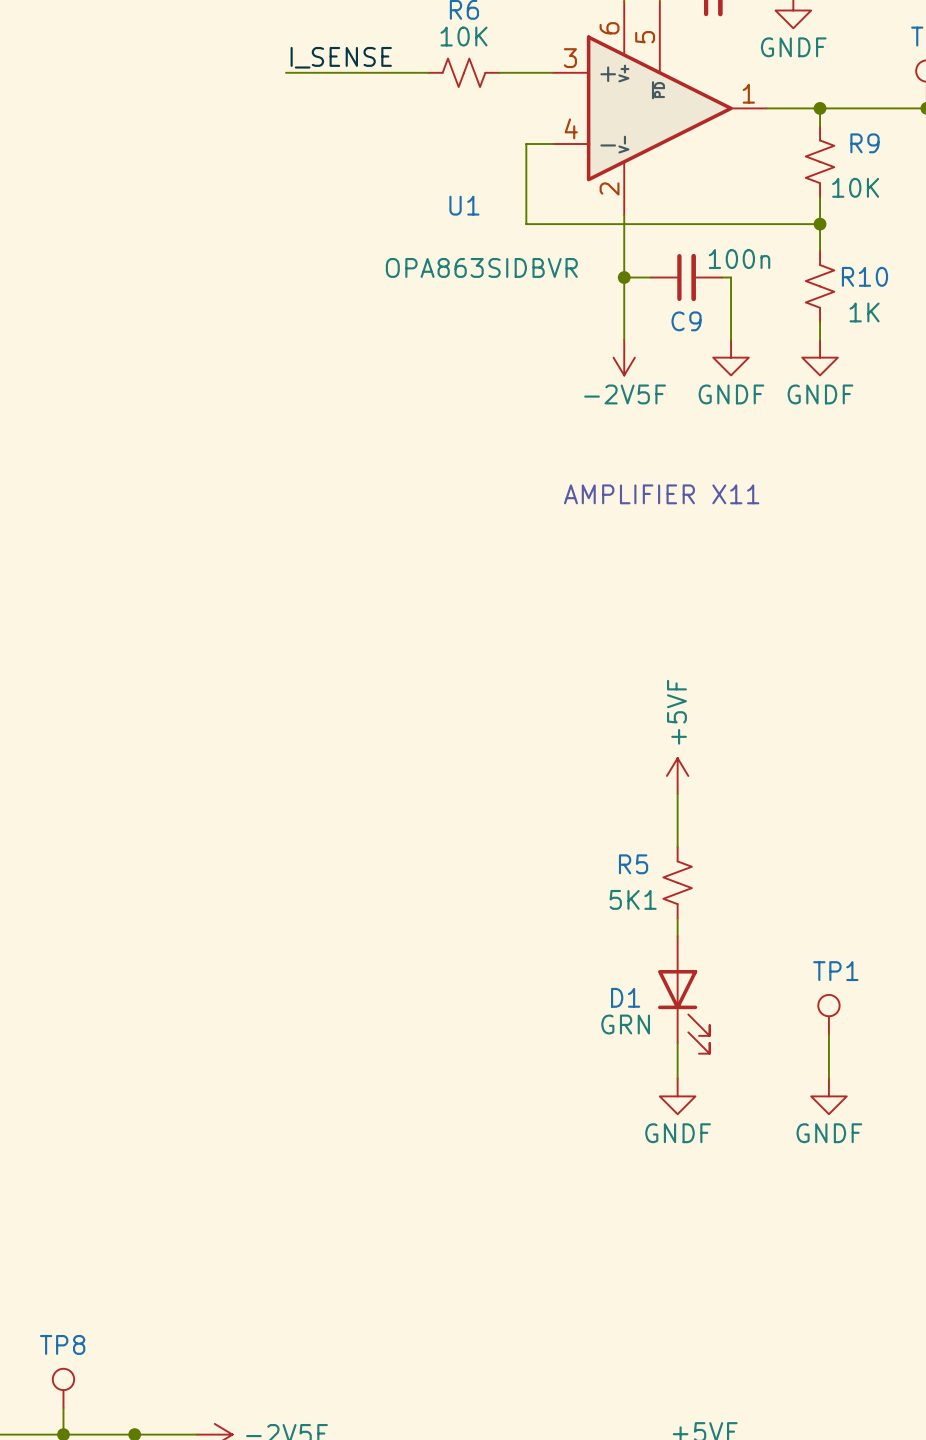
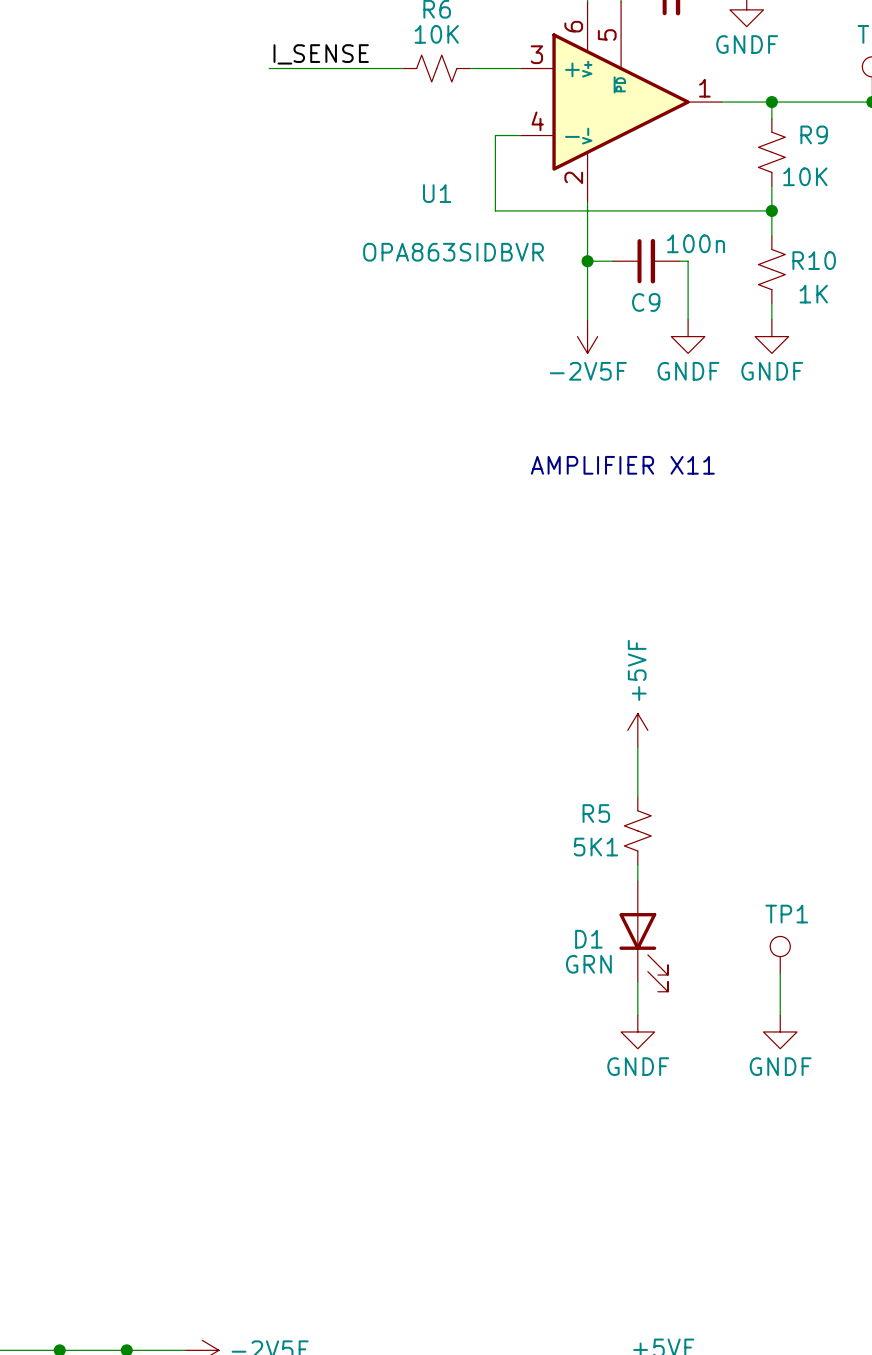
TP8: (63, 1388) -> none
wire: (63, 1407) (63, 1434) -> none

